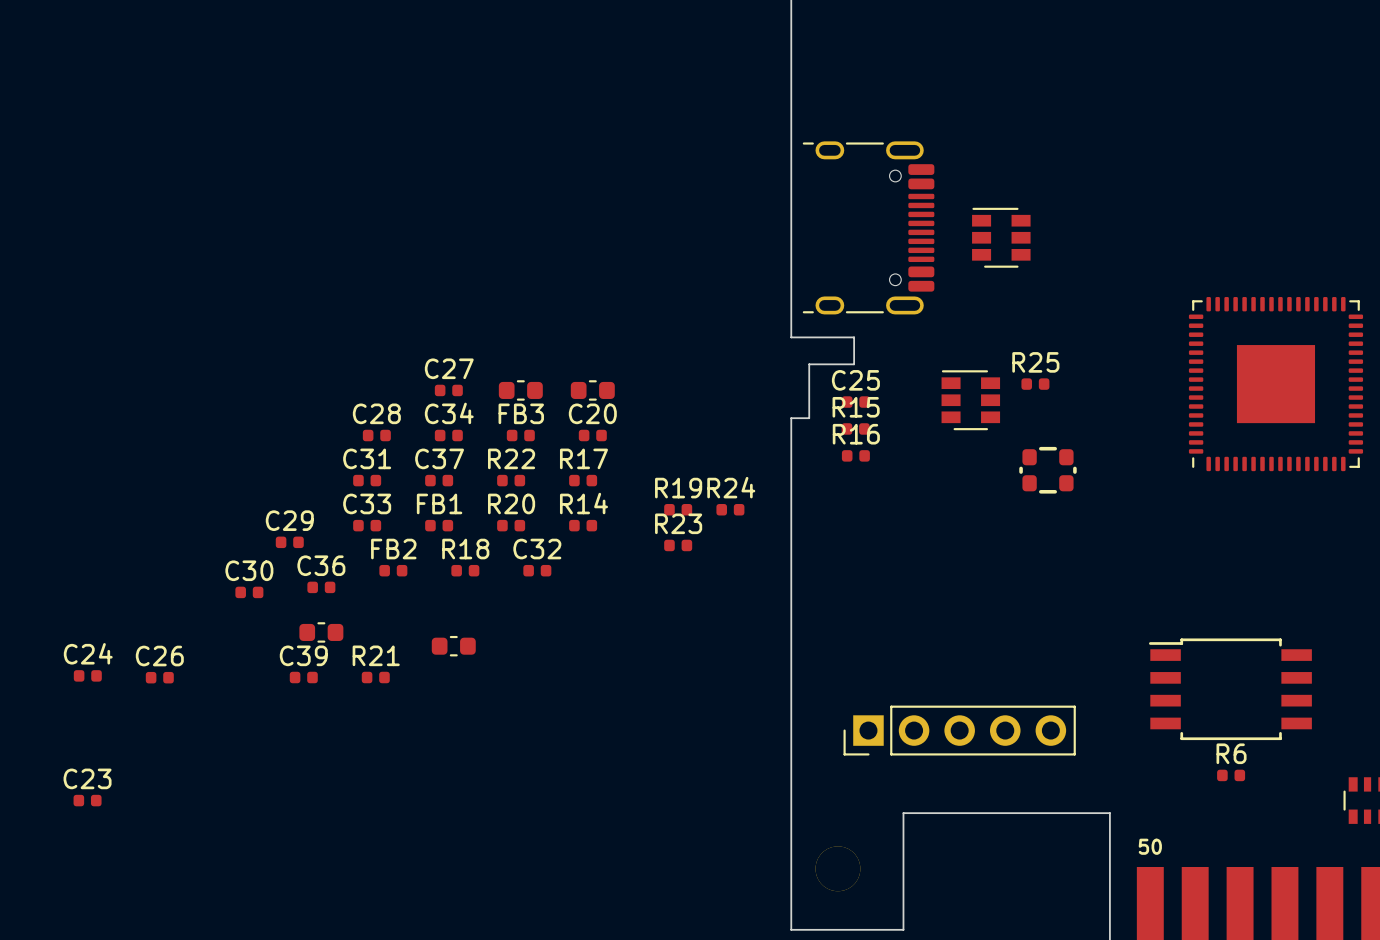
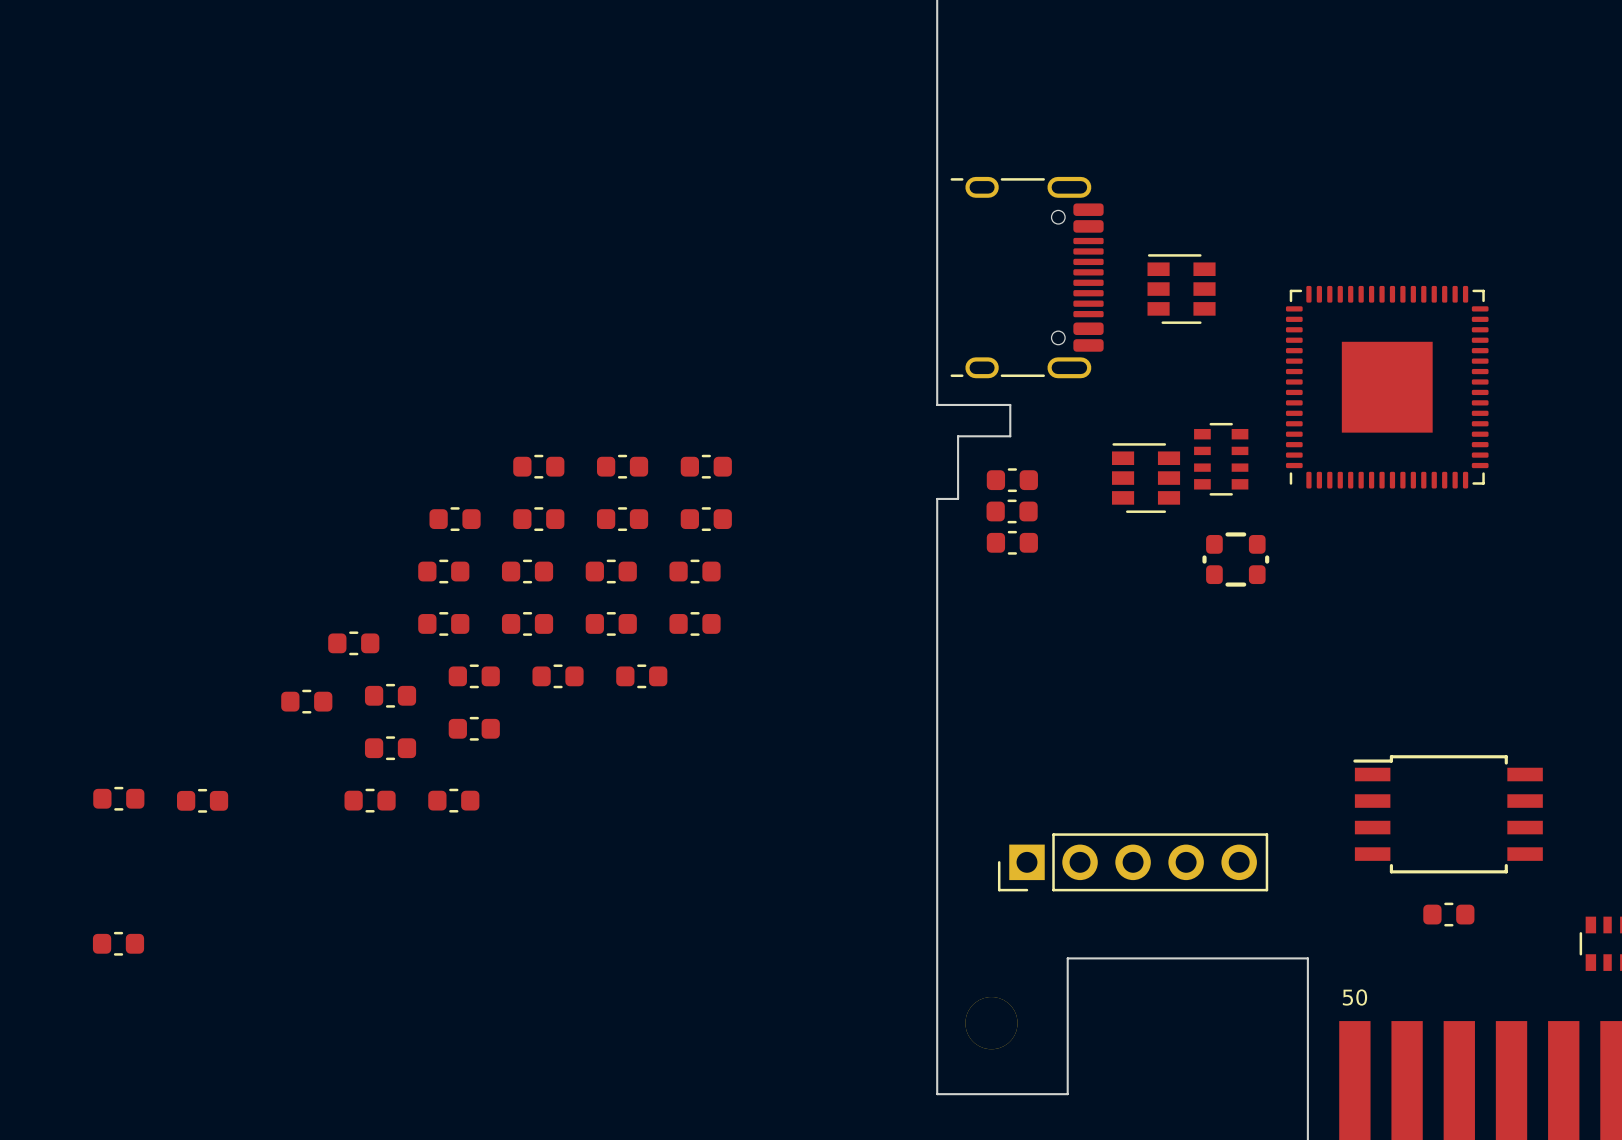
R25: (1035, 384) -> none
part: none -> (1221, 459)
part position: (1275, 384) -> (1387, 387)
C27: (448, 390) -> none
part: none -> (538, 466)
C25: (855, 402) -> none
part: none -> (1012, 480)
R15: (855, 428) -> none
part: none -> (1012, 511)
C28: (376, 435) -> none
part: none -> (455, 519)
C34: (448, 435) -> none
part: none -> (538, 519)
FB3: (520, 435) -> none
part: none -> (622, 519)
C20: (592, 435) -> none
part: none -> (706, 519)
R16: (855, 455) -> none
part: none -> (1012, 542)
C31: (367, 480) -> none
part: none -> (443, 571)
C37: (439, 480) -> none
part: none -> (527, 571)
R22: (511, 480) -> none
part: none -> (611, 571)
R17: (583, 480) -> none
part: none -> (695, 571)
R19: (678, 509) -> none
R24: (730, 509) -> none
C33: (367, 525) -> none
part: none -> (443, 623)
FB1: (439, 525) -> none
part: none -> (527, 623)
R20: (511, 525) -> none
part: none -> (611, 623)
R14: (583, 525) -> none
part: none -> (695, 623)
C29: (289, 542) -> none
part: none -> (353, 643)
R23: (678, 545) -> none
FB2: (393, 570) -> none
part: none -> (474, 676)
R18: (465, 570) -> none
part: none -> (558, 676)
C32: (537, 570) -> none
part: none -> (641, 676)
C36: (321, 587) -> none
part: none -> (390, 695)
C30: (249, 592) -> none
part: none -> (306, 701)
part: none -> (474, 728)
part: (453, 646) -> none
C24: (87, 675) -> none
part: none -> (118, 798)
C26: (159, 677) -> none
part: none -> (202, 800)
C39: (303, 677) -> none
part: none -> (370, 800)
R21: (375, 677) -> none
part: none -> (453, 800)
R6: (1231, 775) -> none
part: none -> (1448, 914)
C23: (87, 800) -> none
part: none -> (118, 943)

